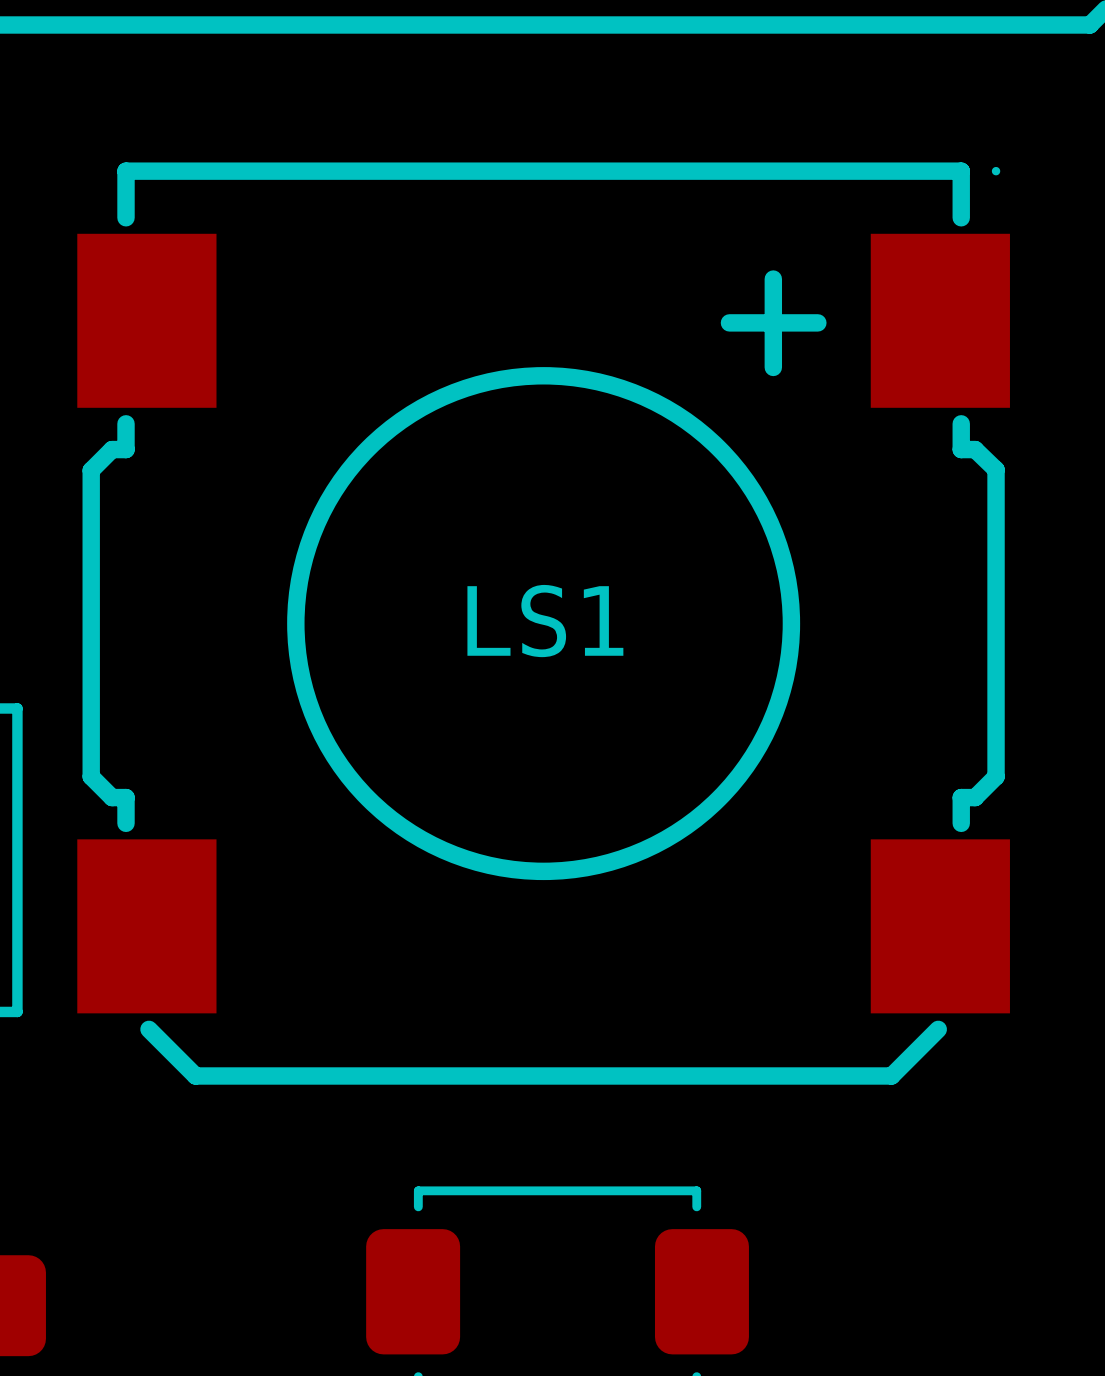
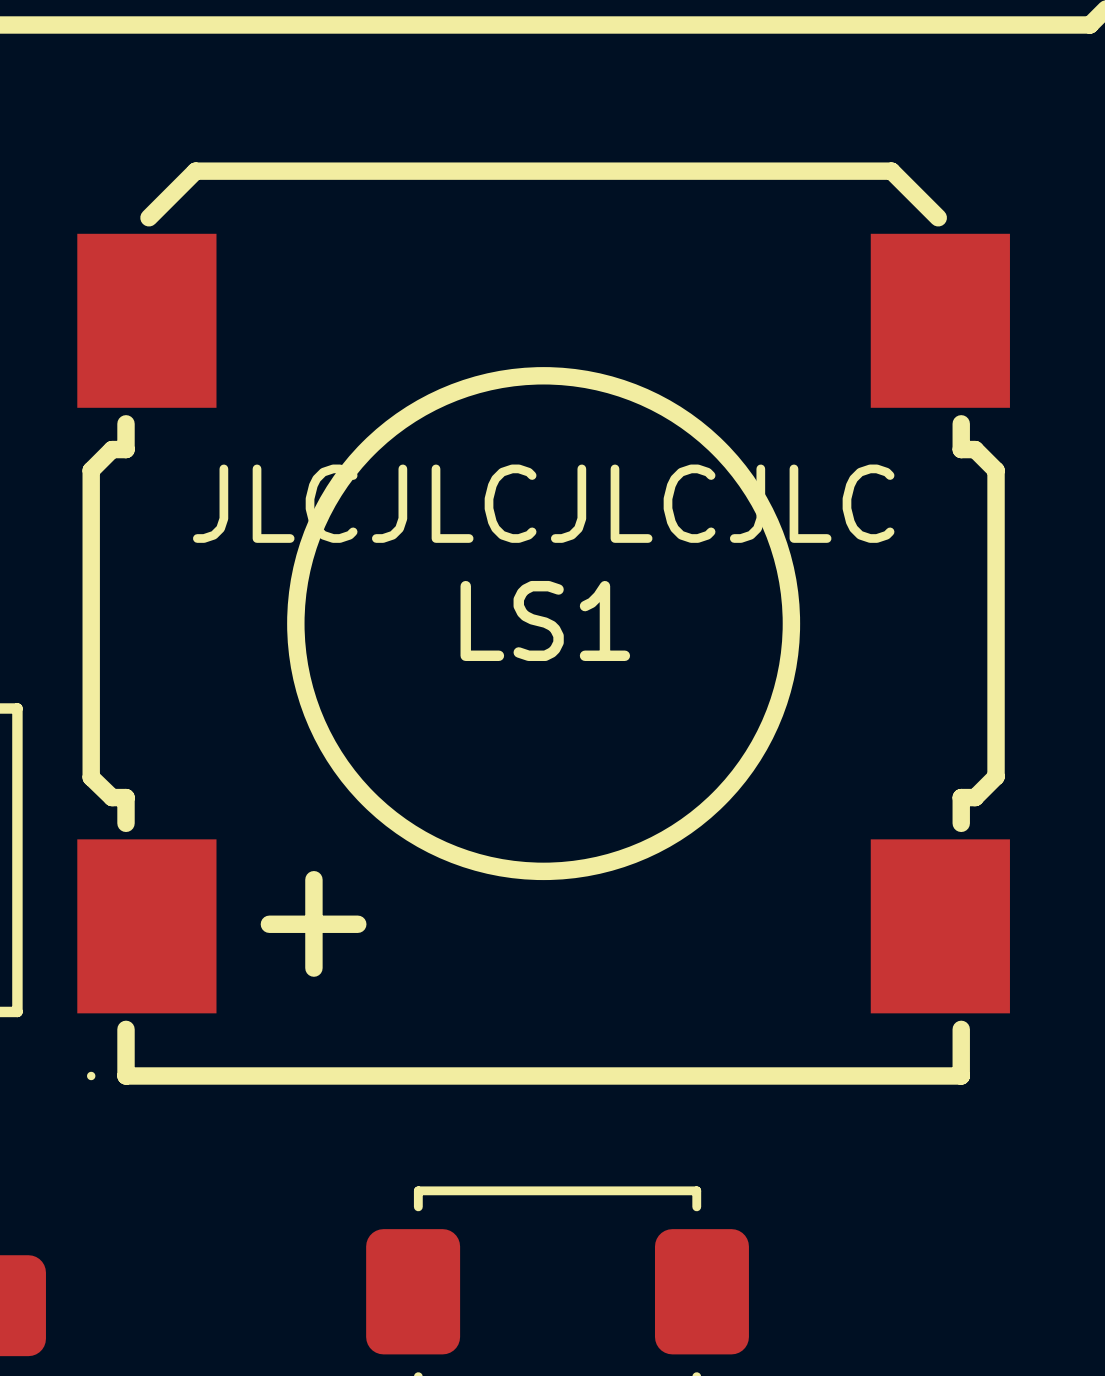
text: none -> JLCJLCJLCJLC (543, 503)
LS1 rotation: 0° (543, 623) -> 180° (543, 623)

